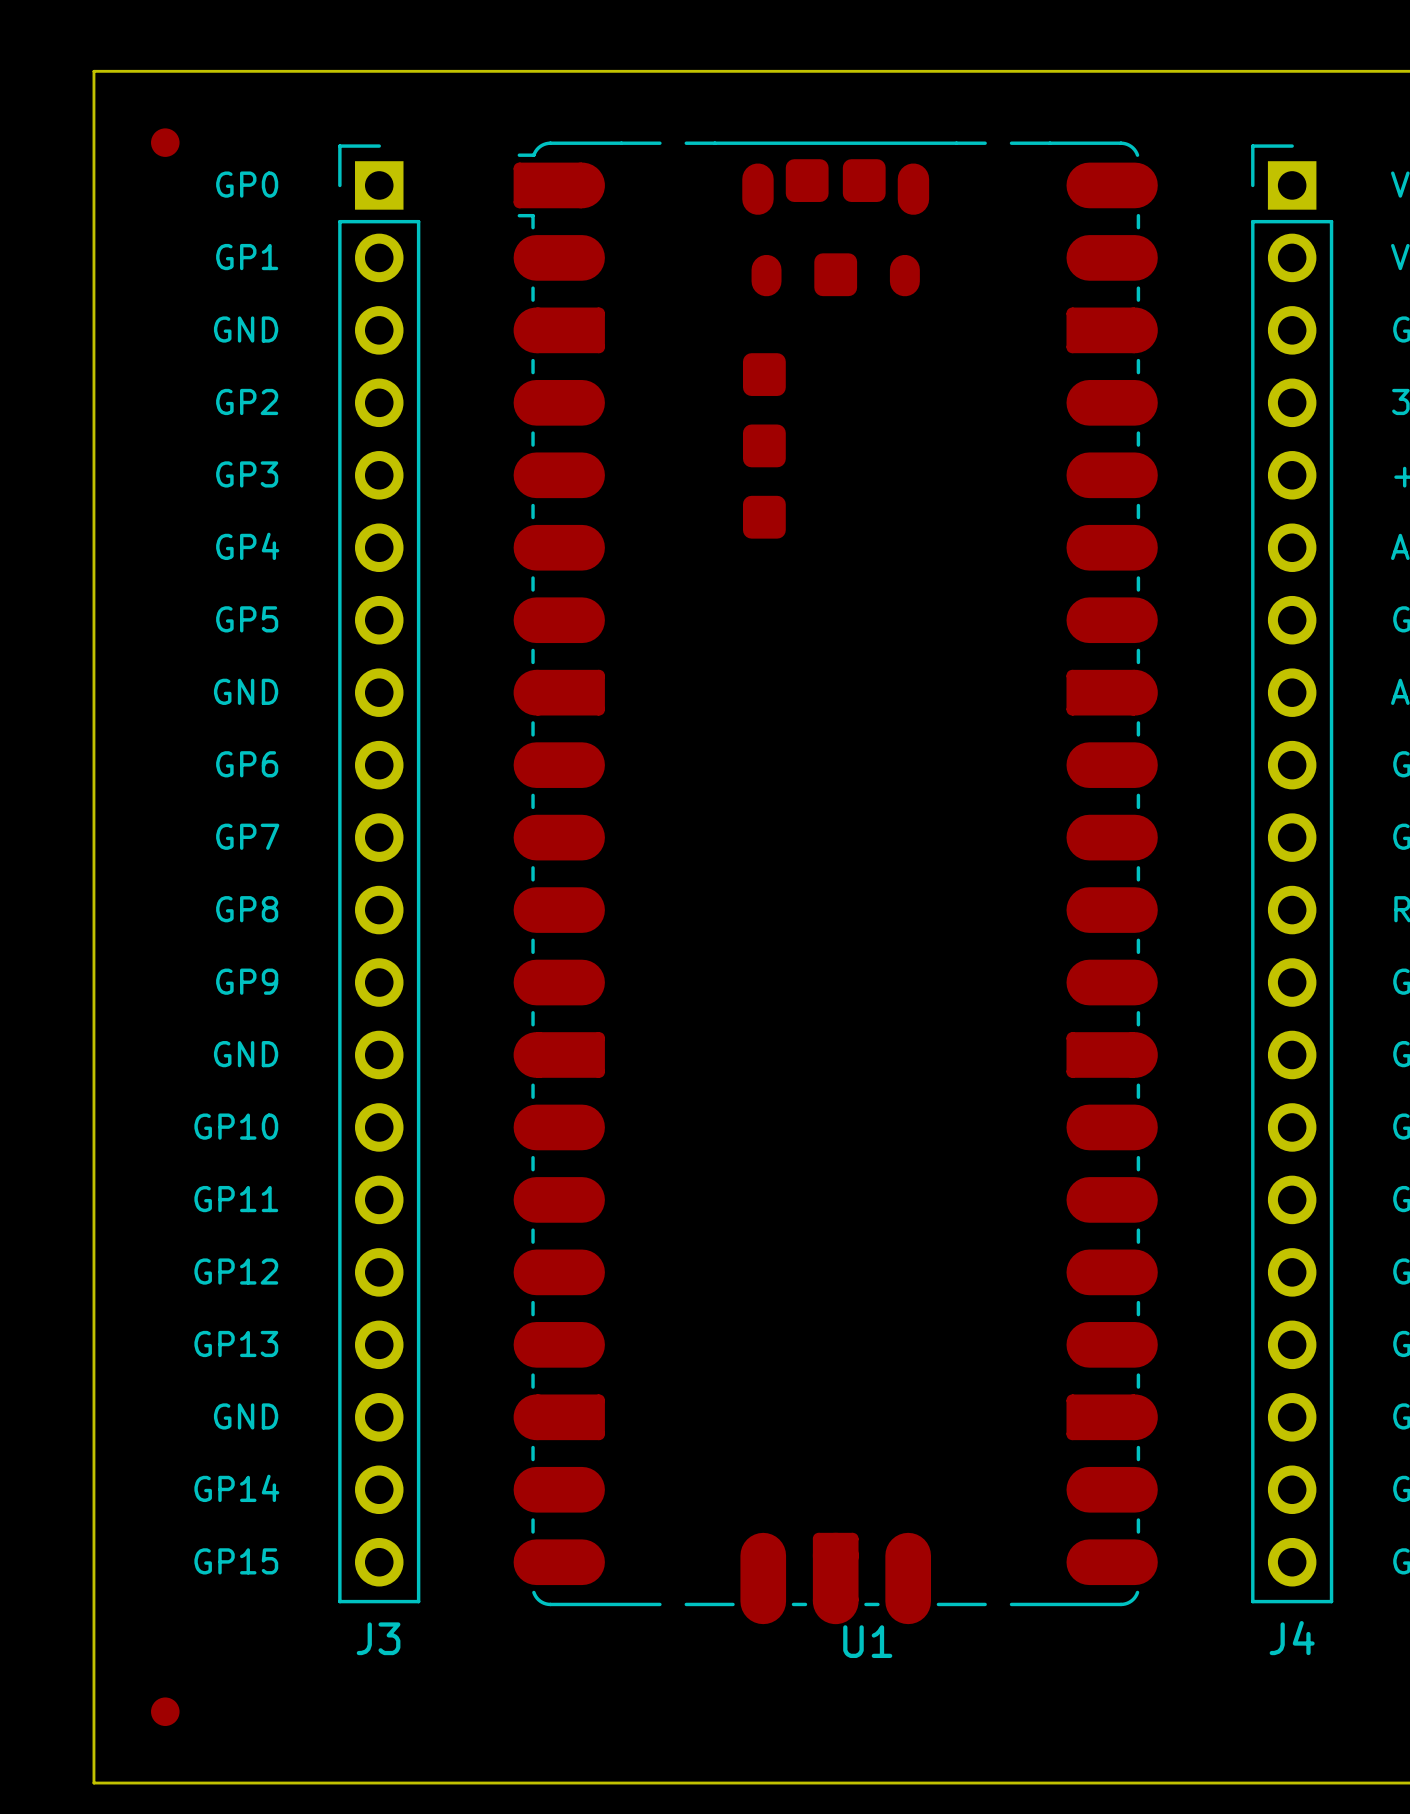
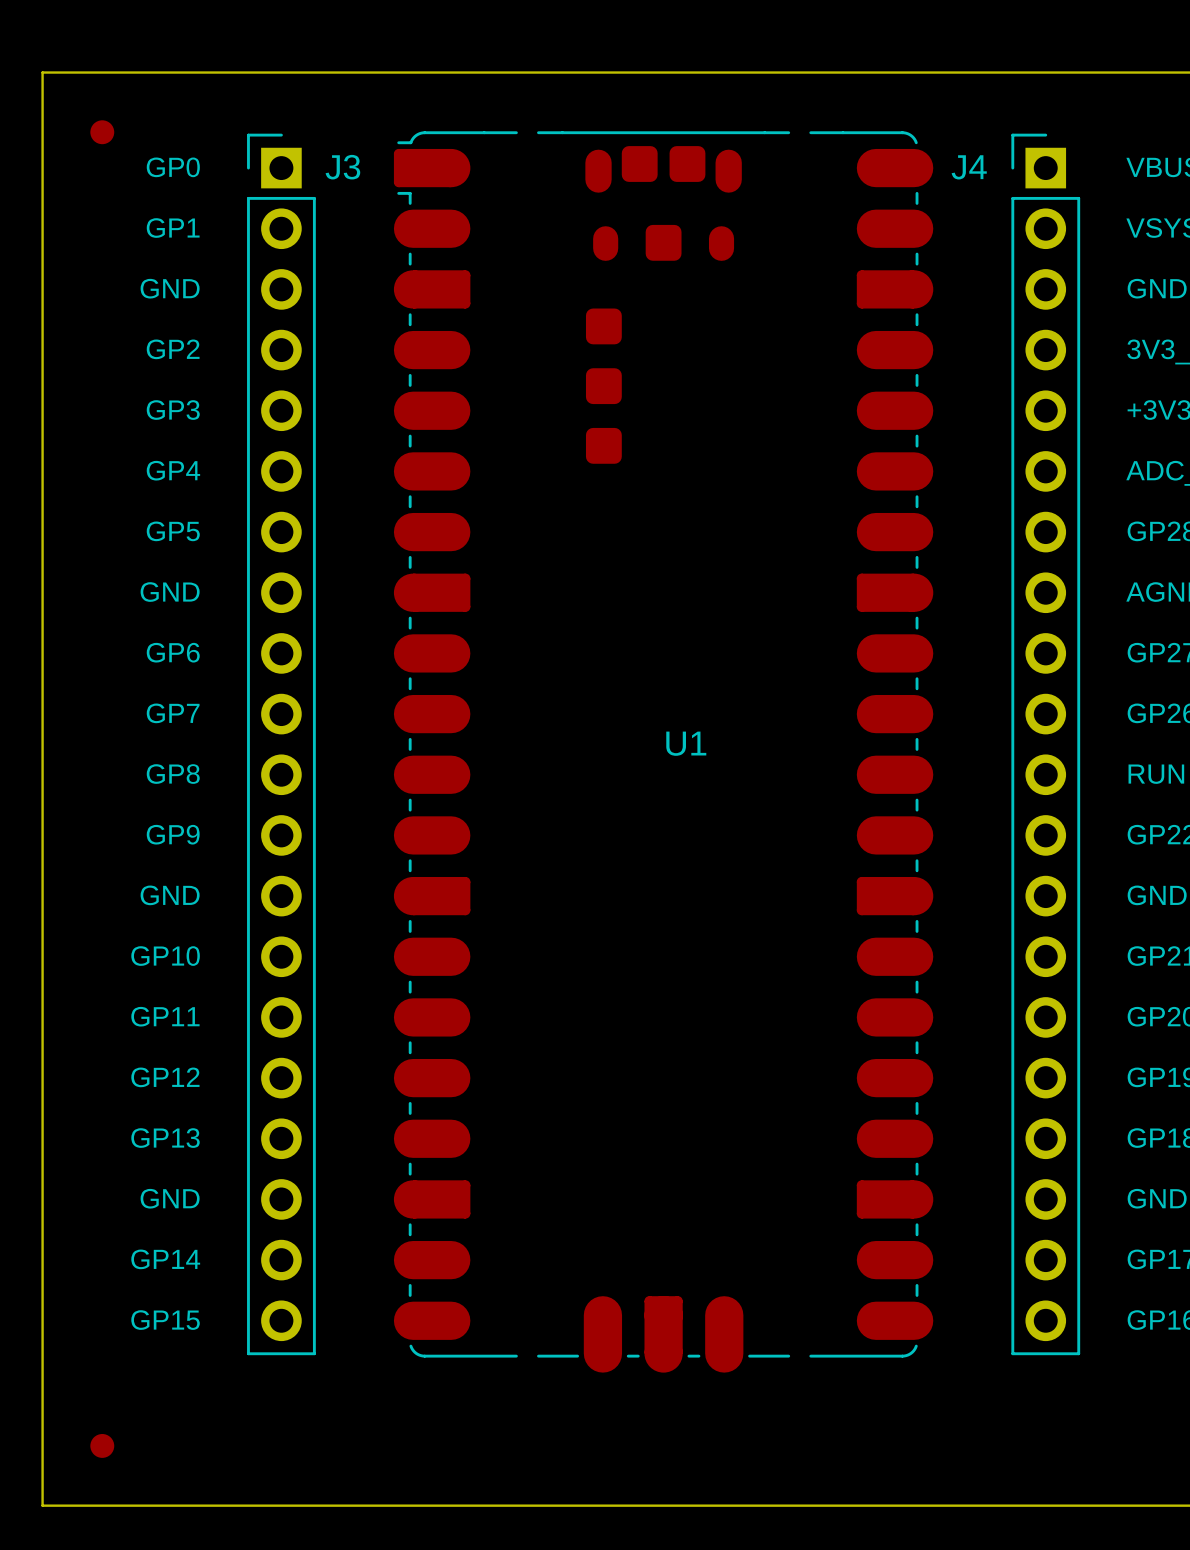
J3 name position: J3 (378, 1638) -> J3 (342, 167)
J4 name position: J4 (1292, 1638) -> J4 (969, 167)
U1 name position: U1 (867, 1641) -> U1 (686, 743)

